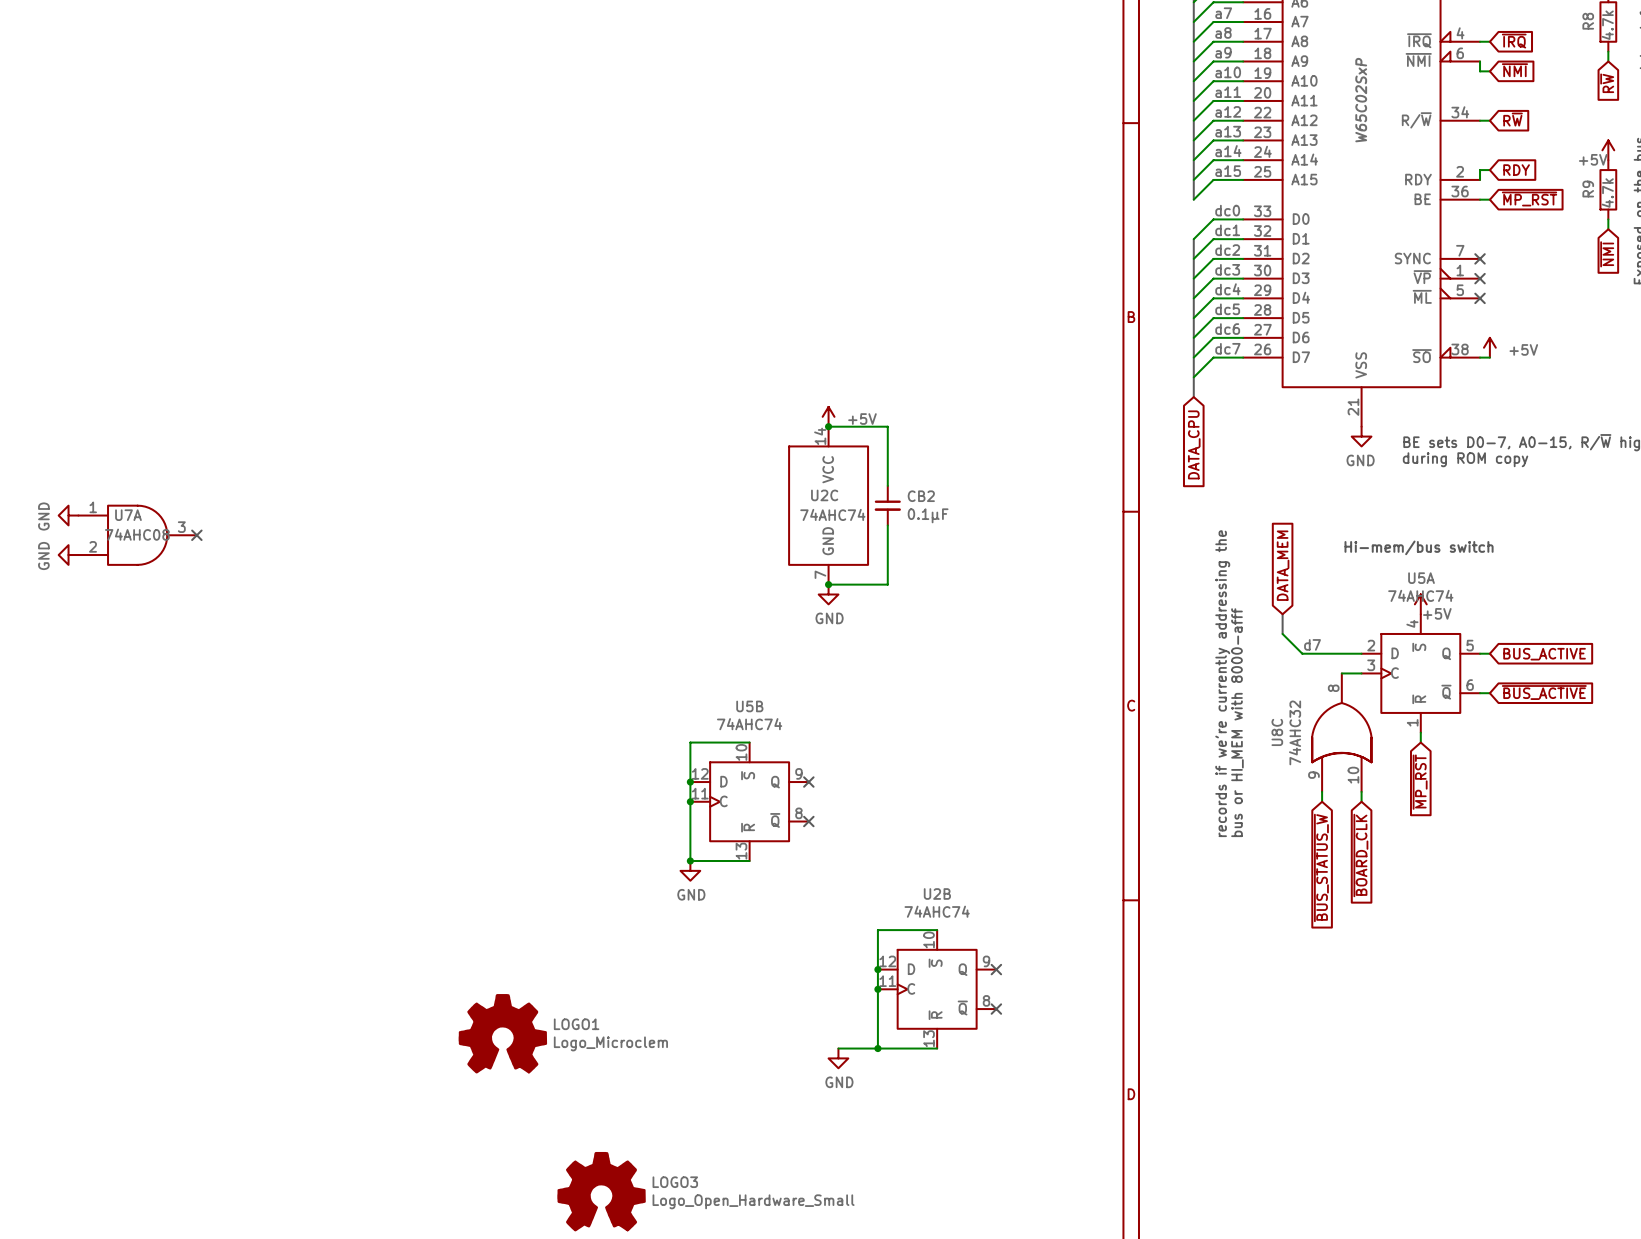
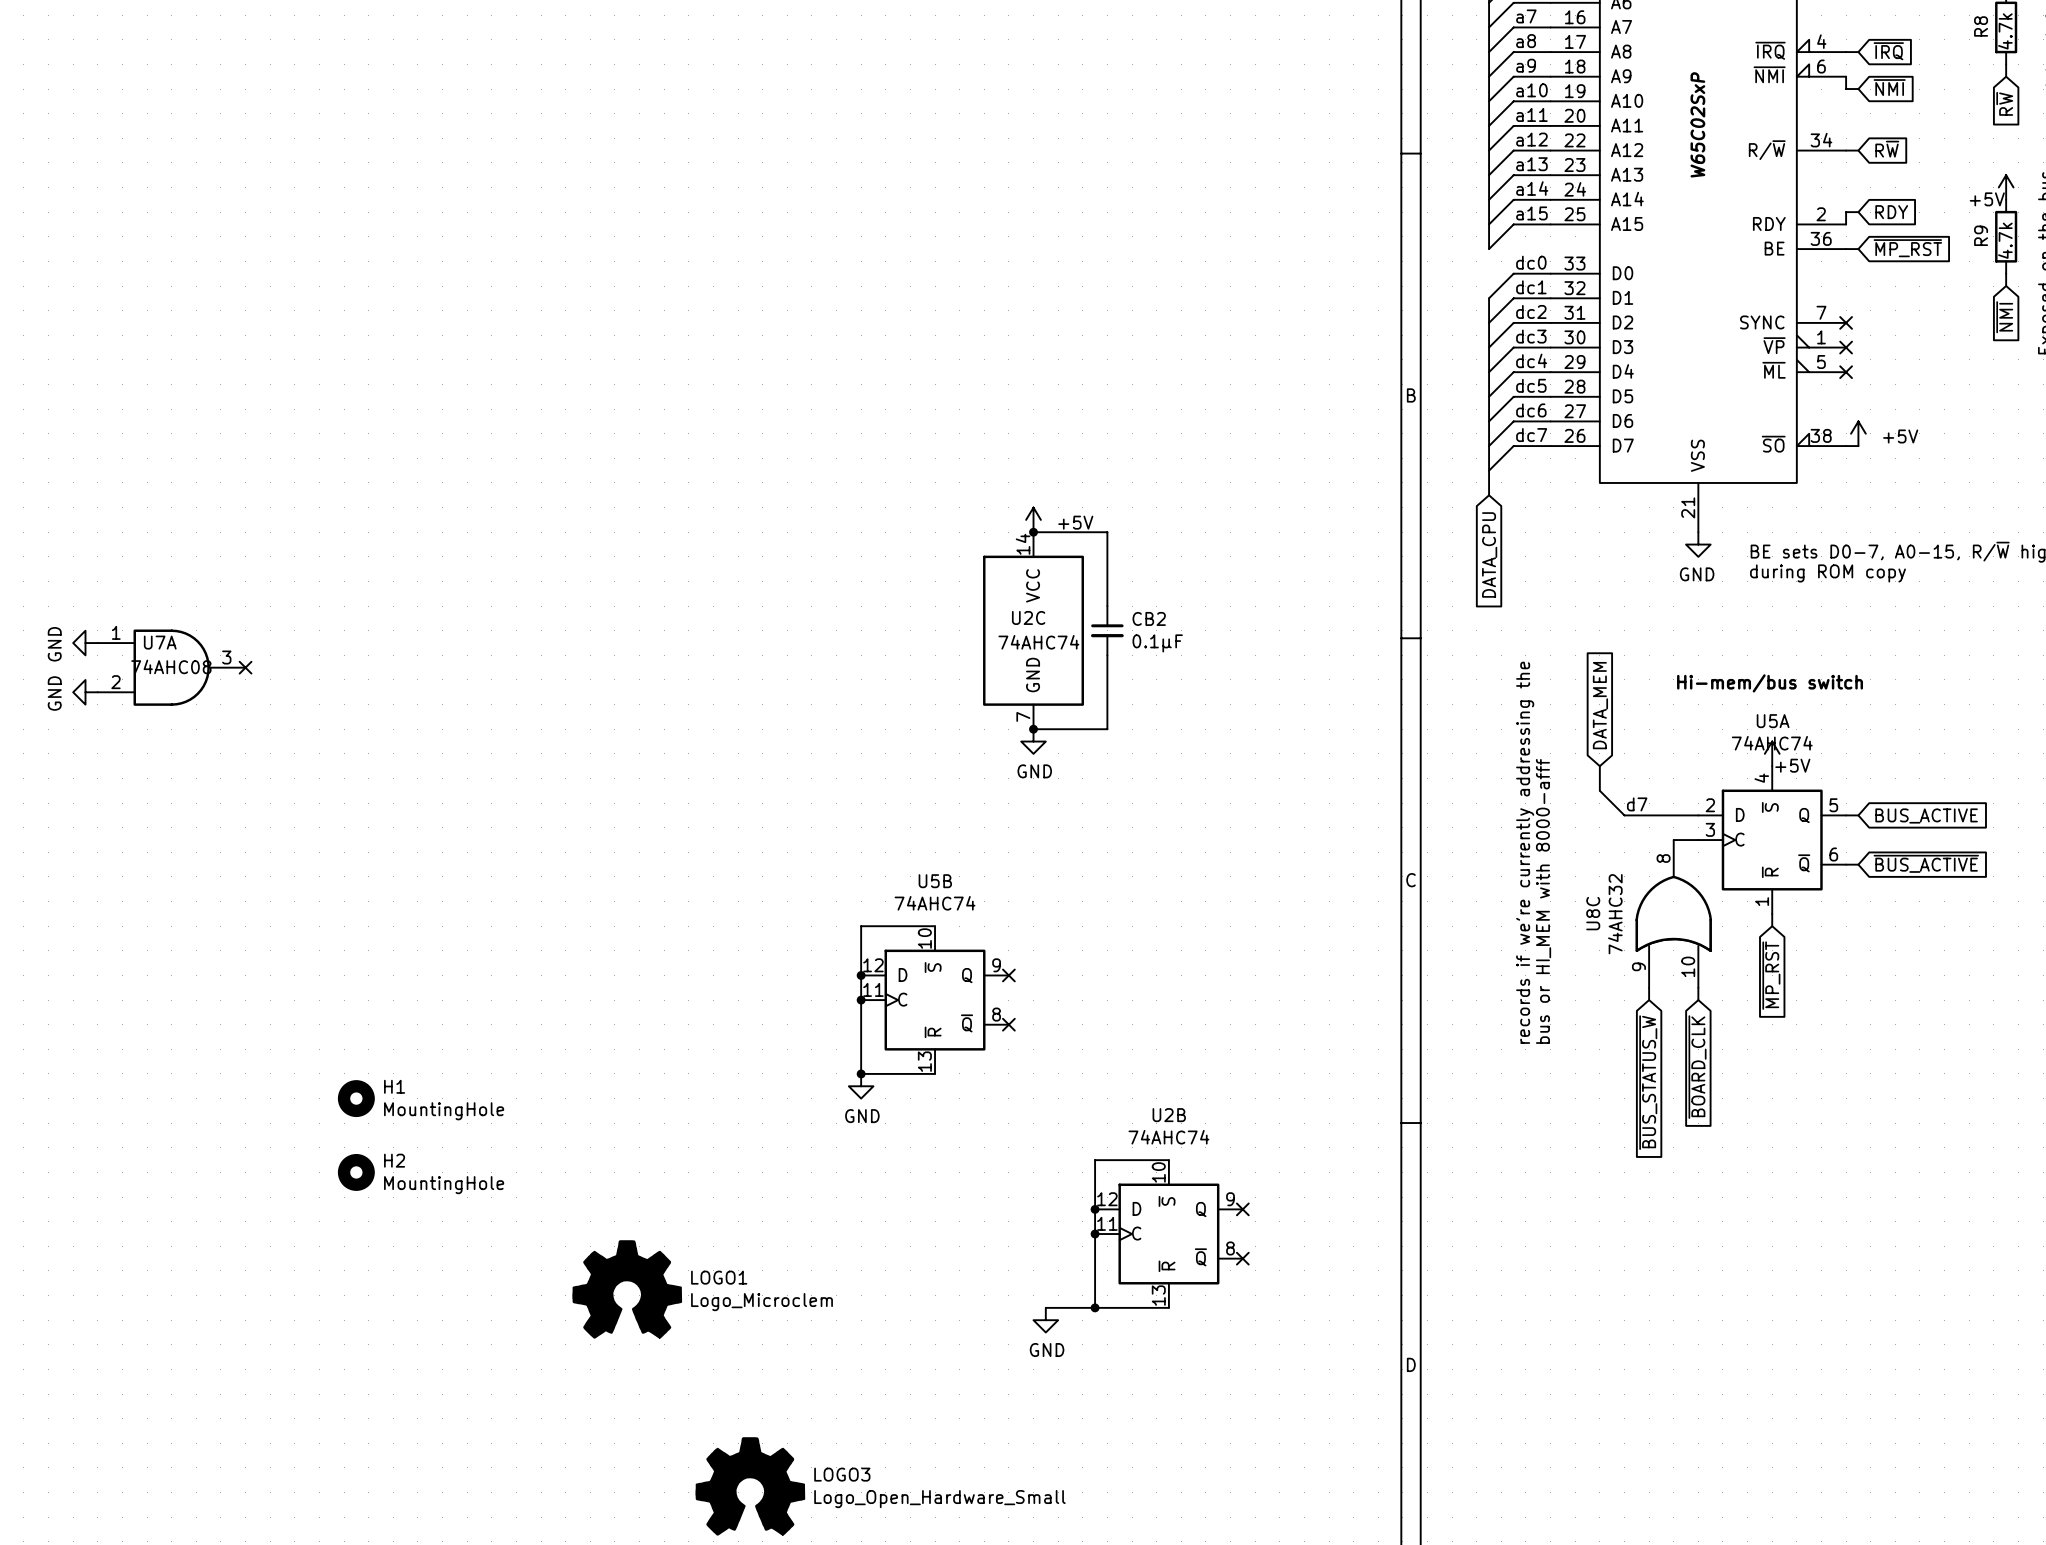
H1: none -> MountingHole (356, 1098)
H2: none -> MountingHole (356, 1172)

